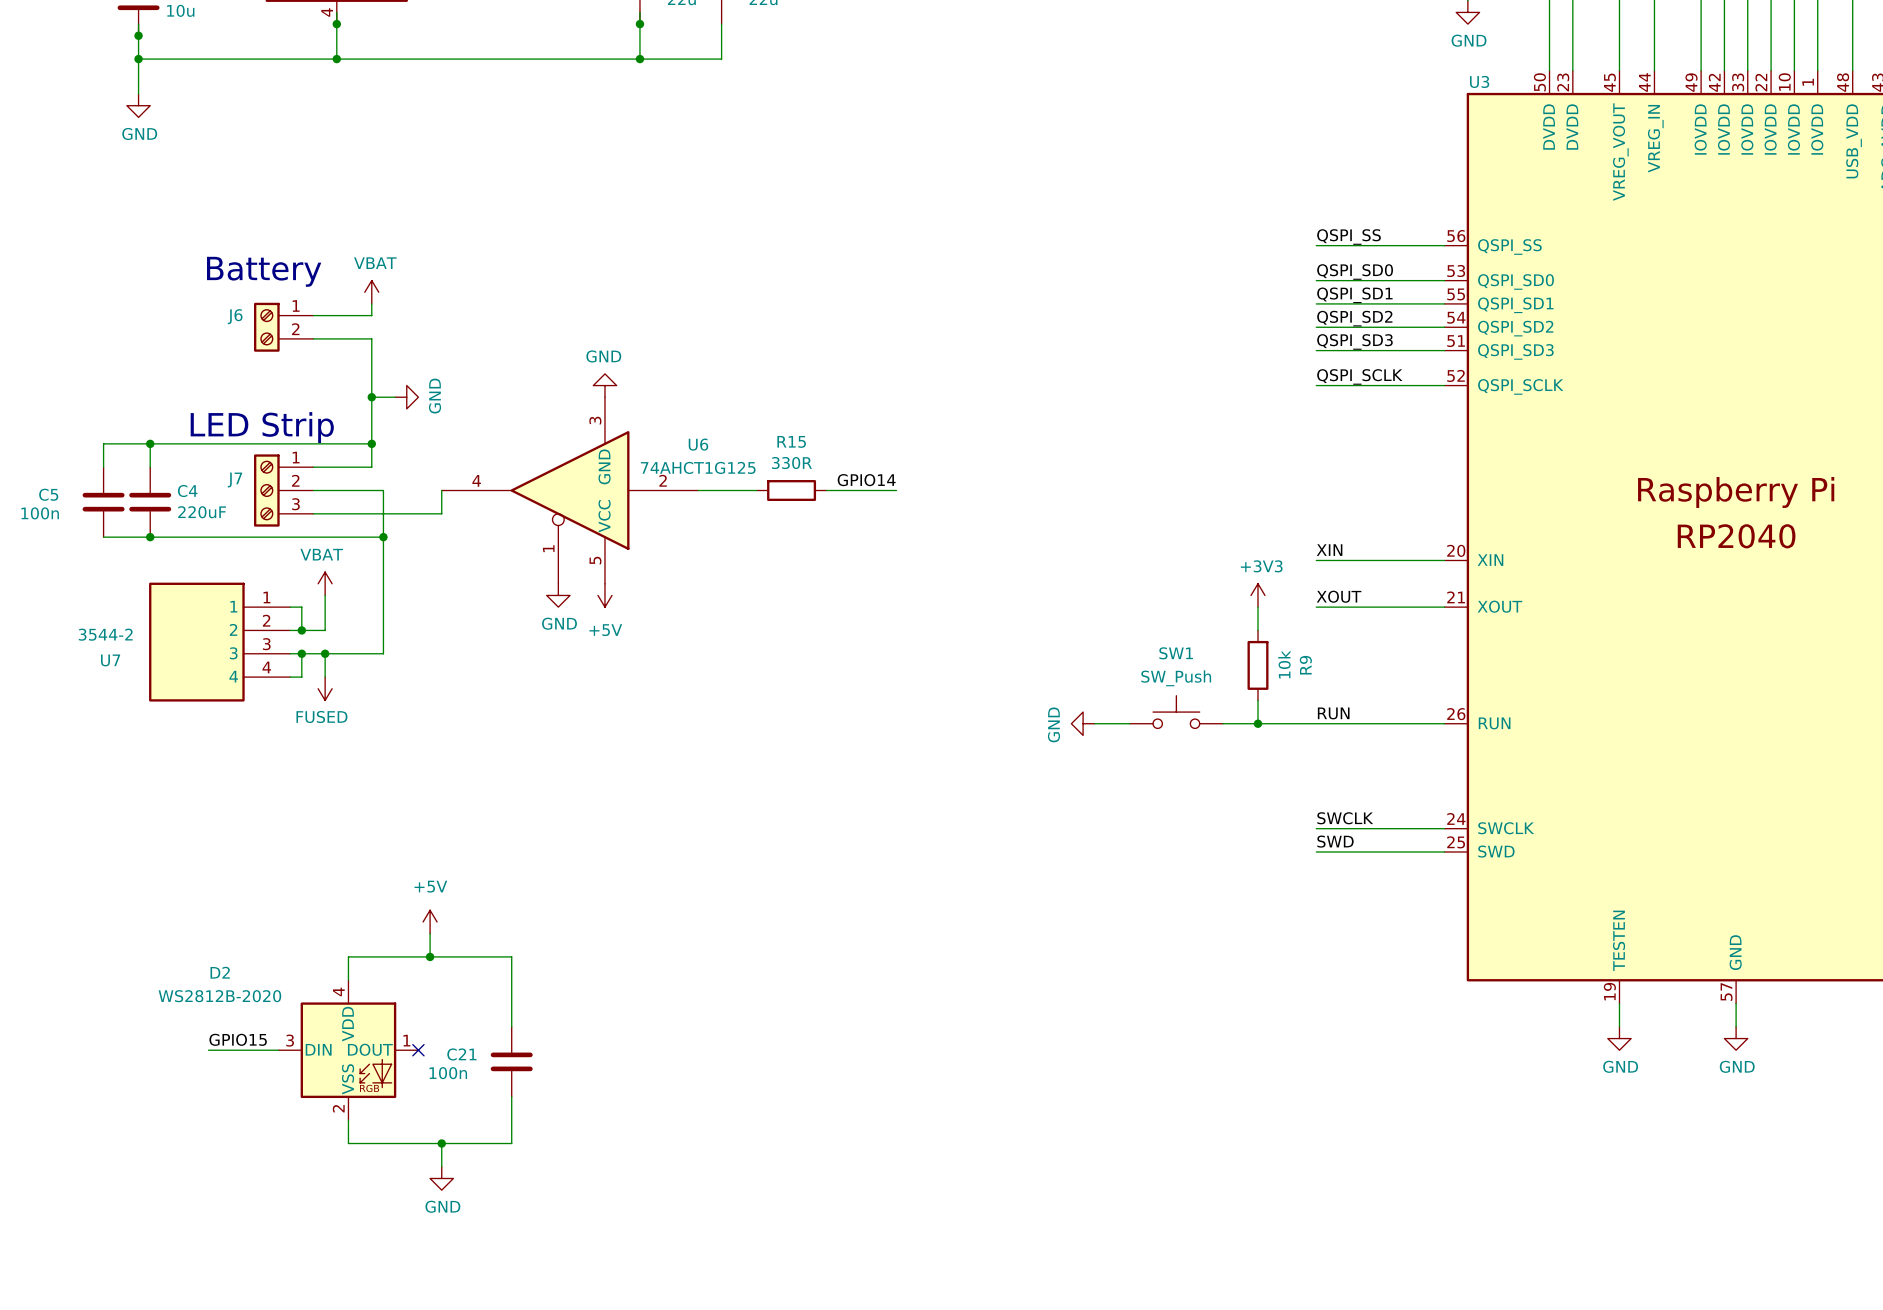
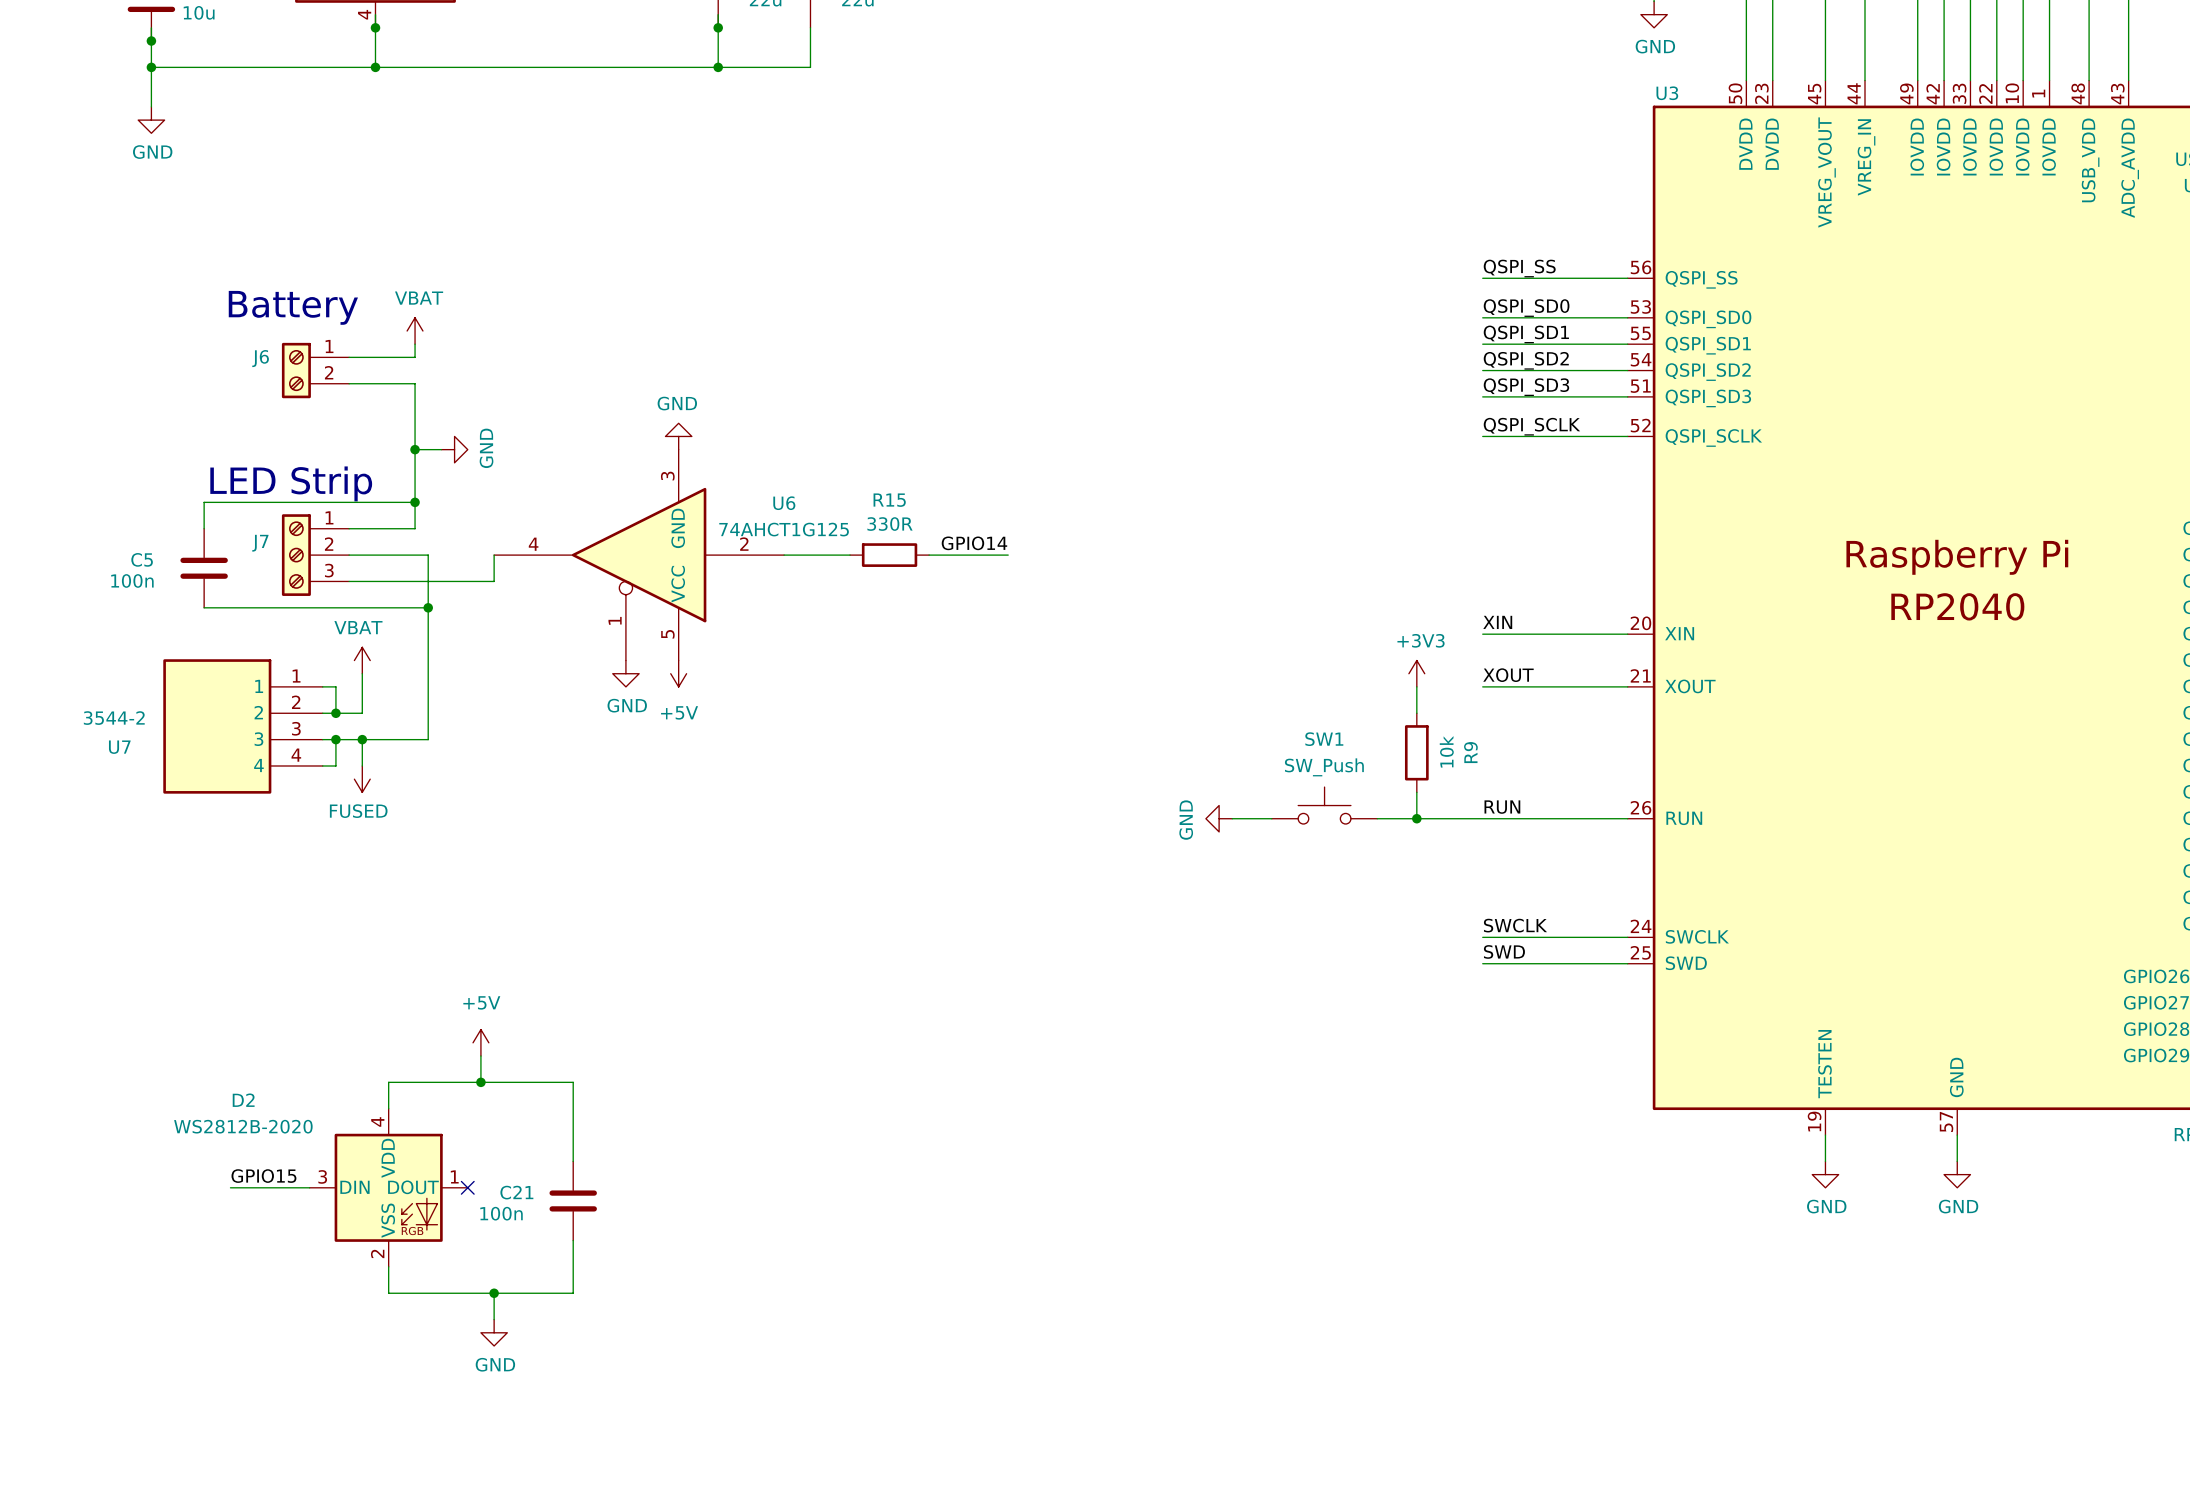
wire: (150, 443) (150, 467) -> none
junction: (150, 443) -> none
wire: (185, 443) (103, 443) (103, 467) -> (204, 502) (204, 528)
C5 position: (103, 502) -> (204, 568)
C4: 220uF (150, 502) -> none
wire: (103, 537) (185, 537) -> none
junction: (150, 537) -> none

